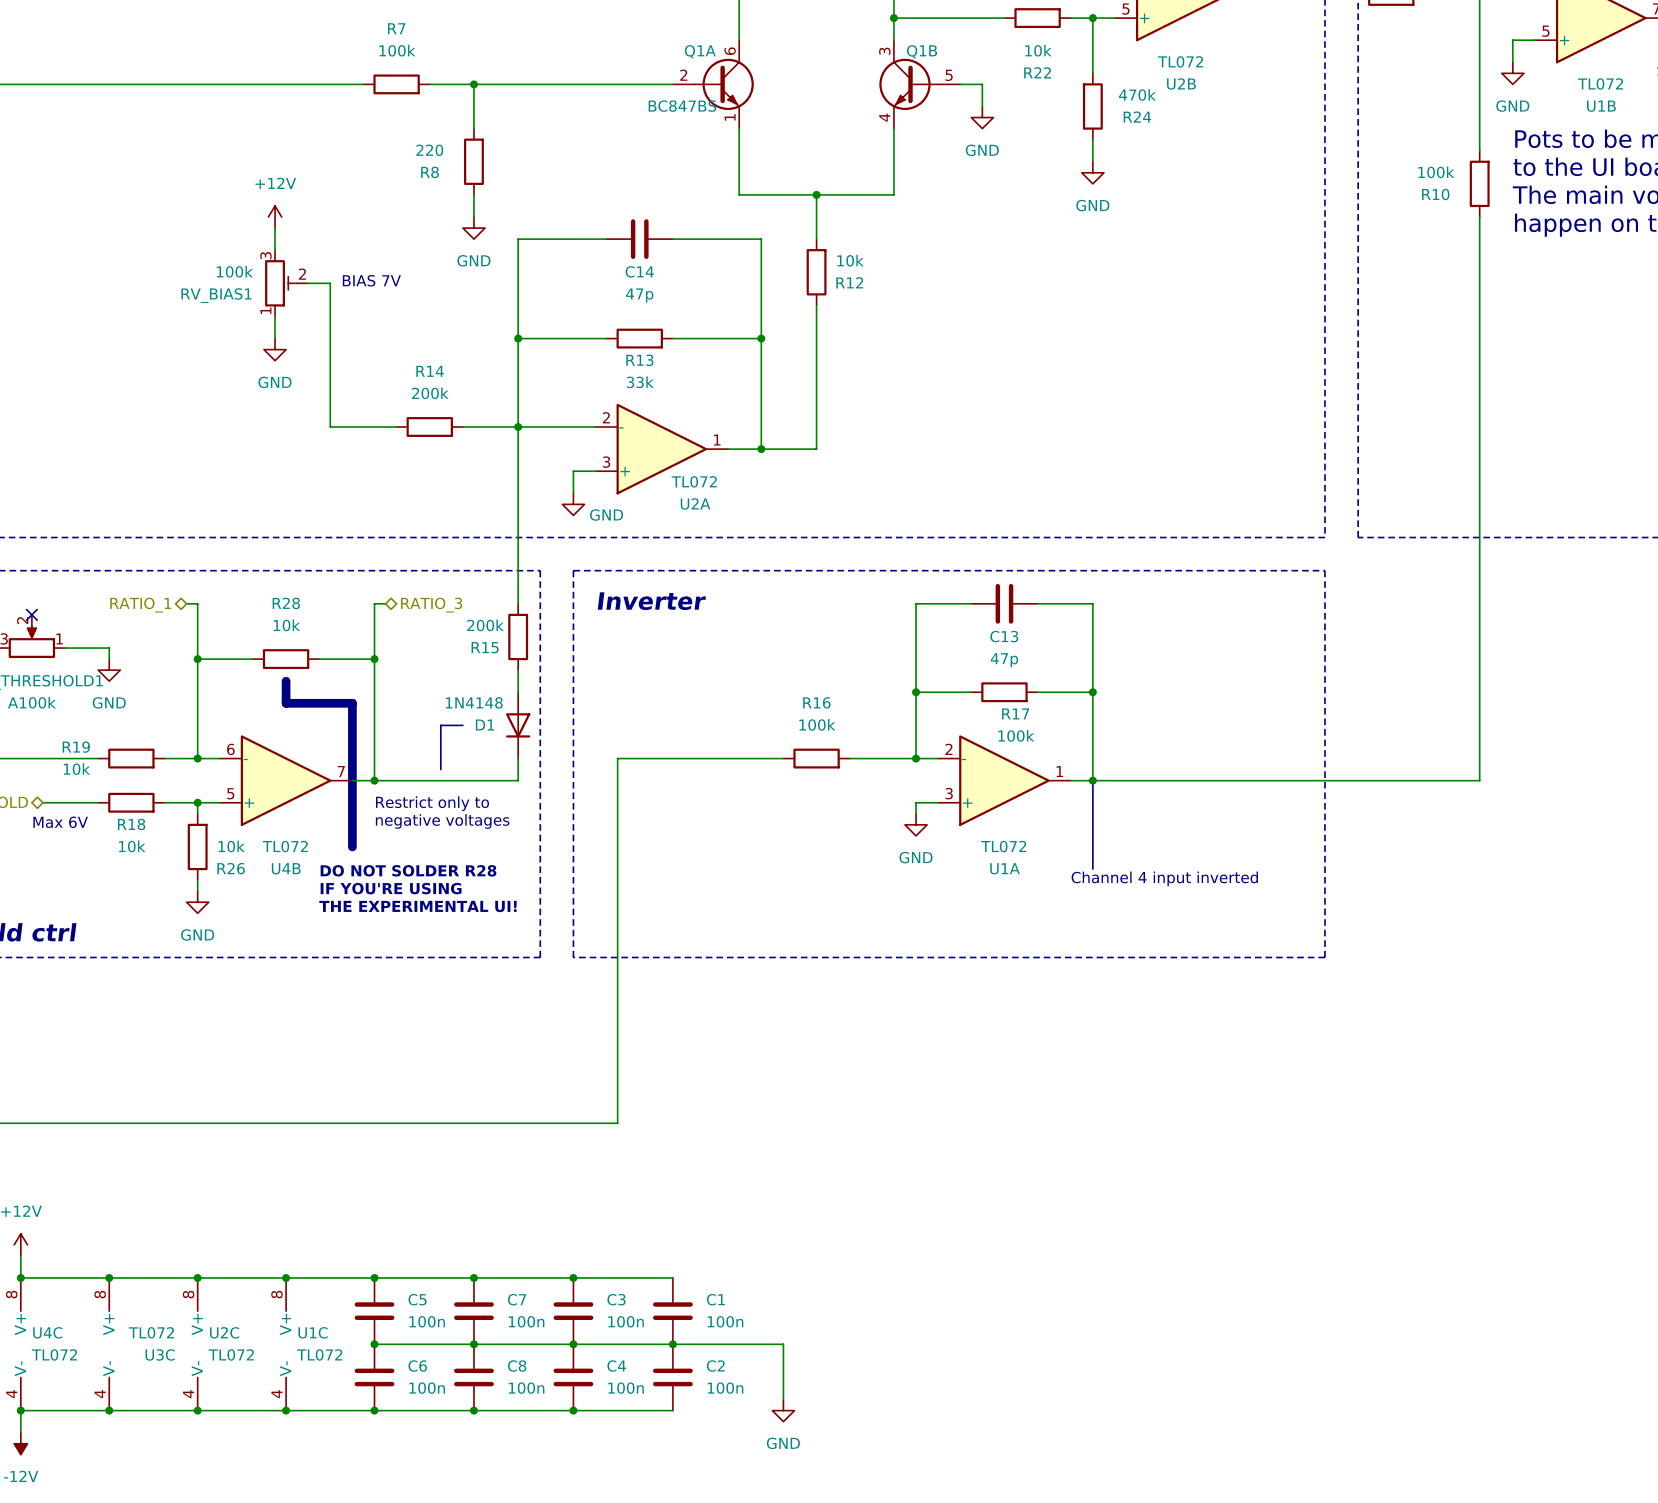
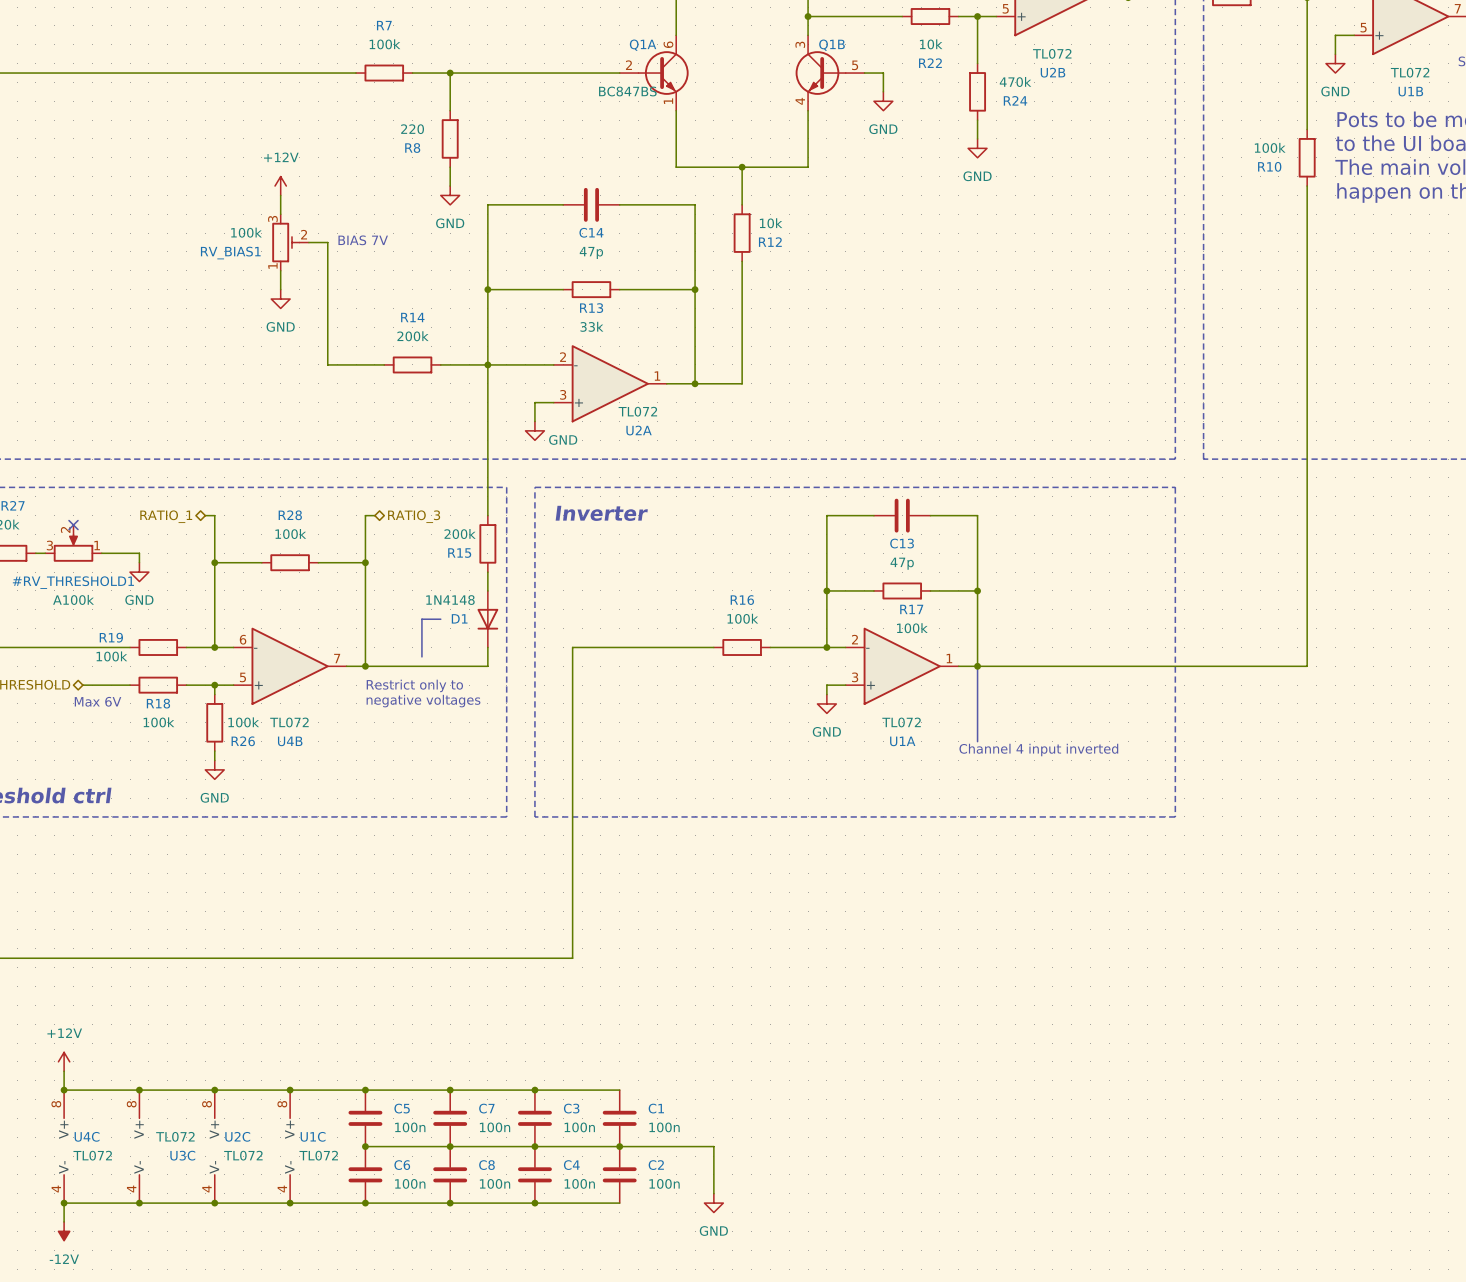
R28 value: 10k (286, 625) -> 100k (290, 534)
line: (286, 681) (286, 703) (352, 703) (352, 846) -> none
R19 value: 10k (76, 769) -> 100k (111, 656)
R18 value: 10k (132, 846) -> 100k (158, 722)
R26 value: 10k (231, 846) -> 100k (243, 722)
text: DO NOT SOLDER R28 (408, 870) -> none
text: IF YOU'RE USING (391, 888) -> none
text: THE EXPERIMENTAL UI! (417, 906) -> none

